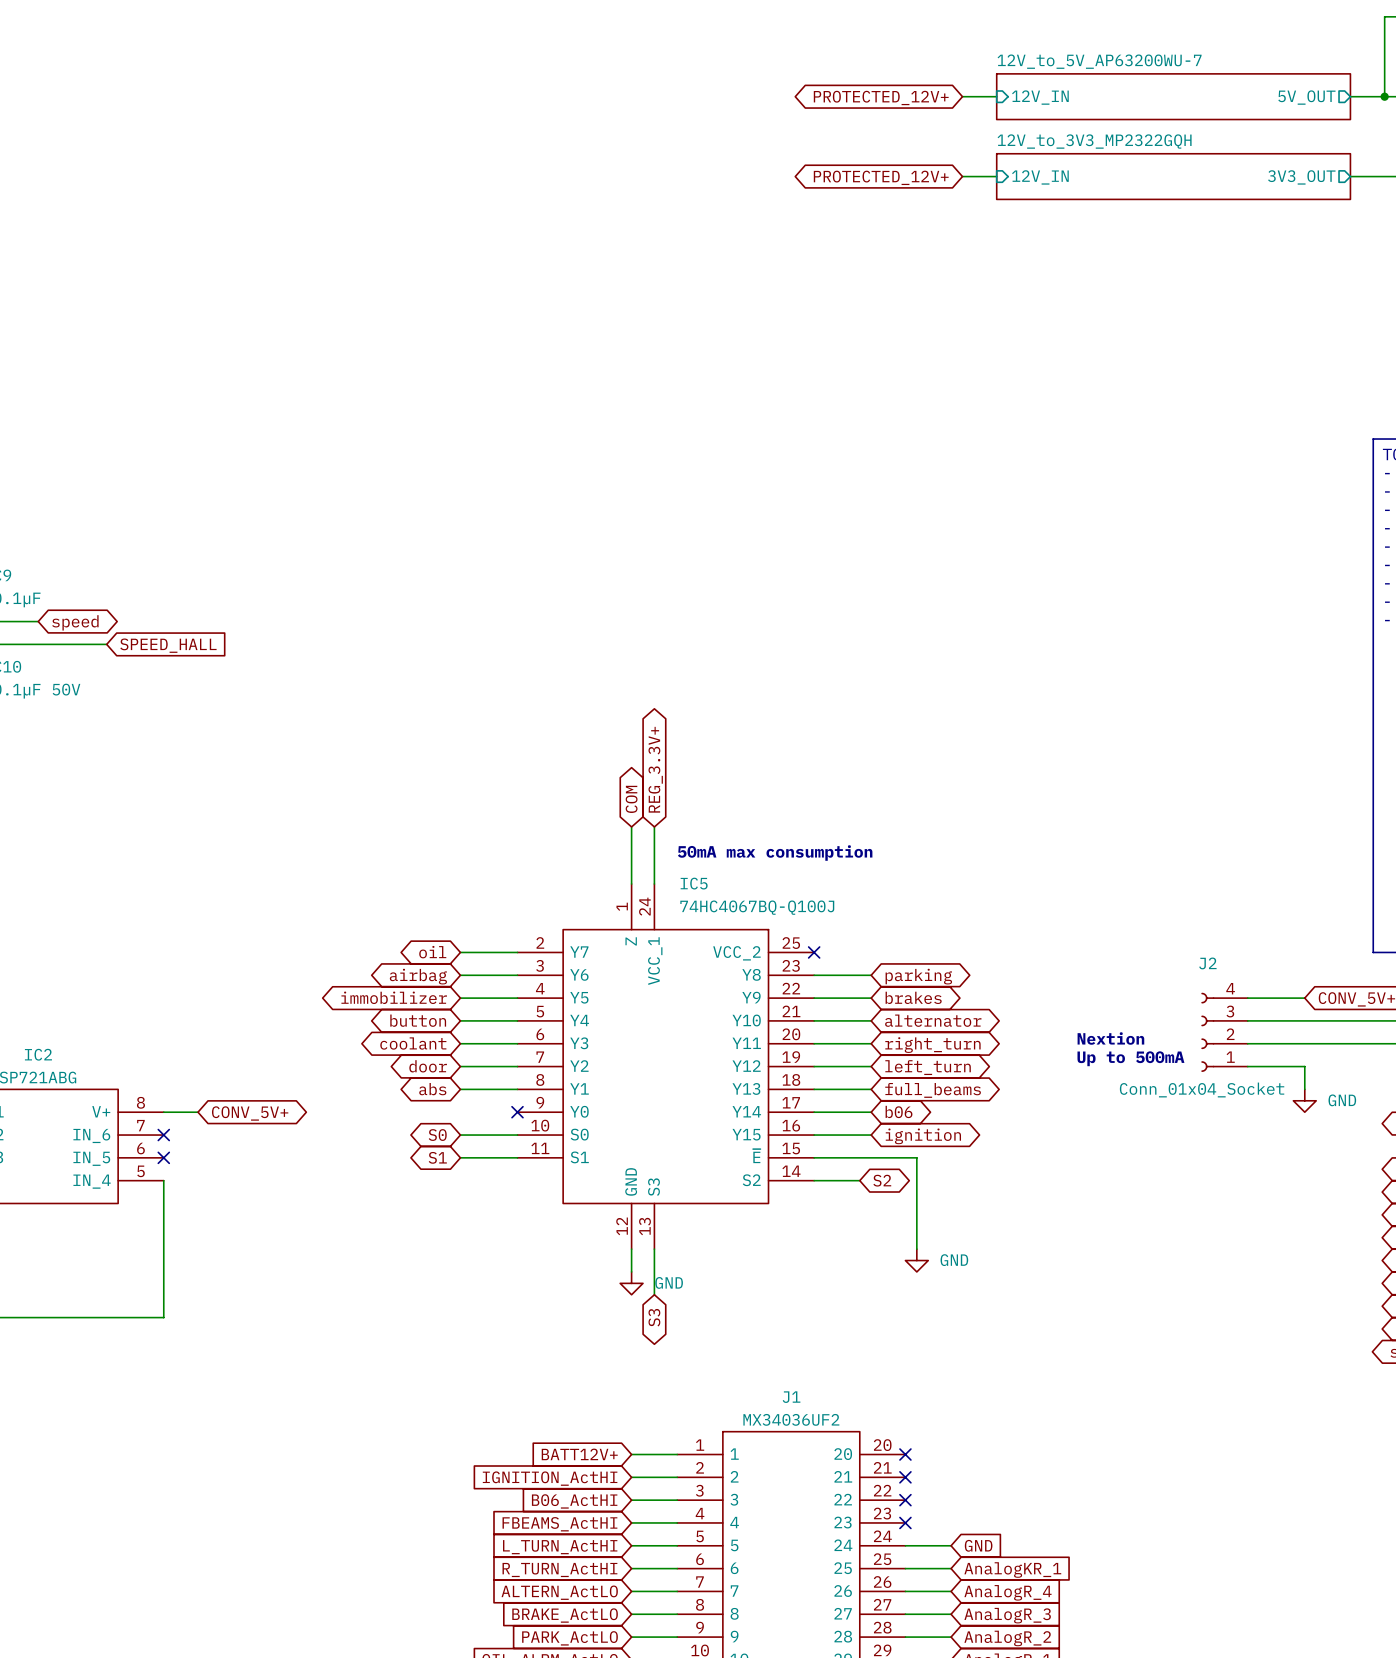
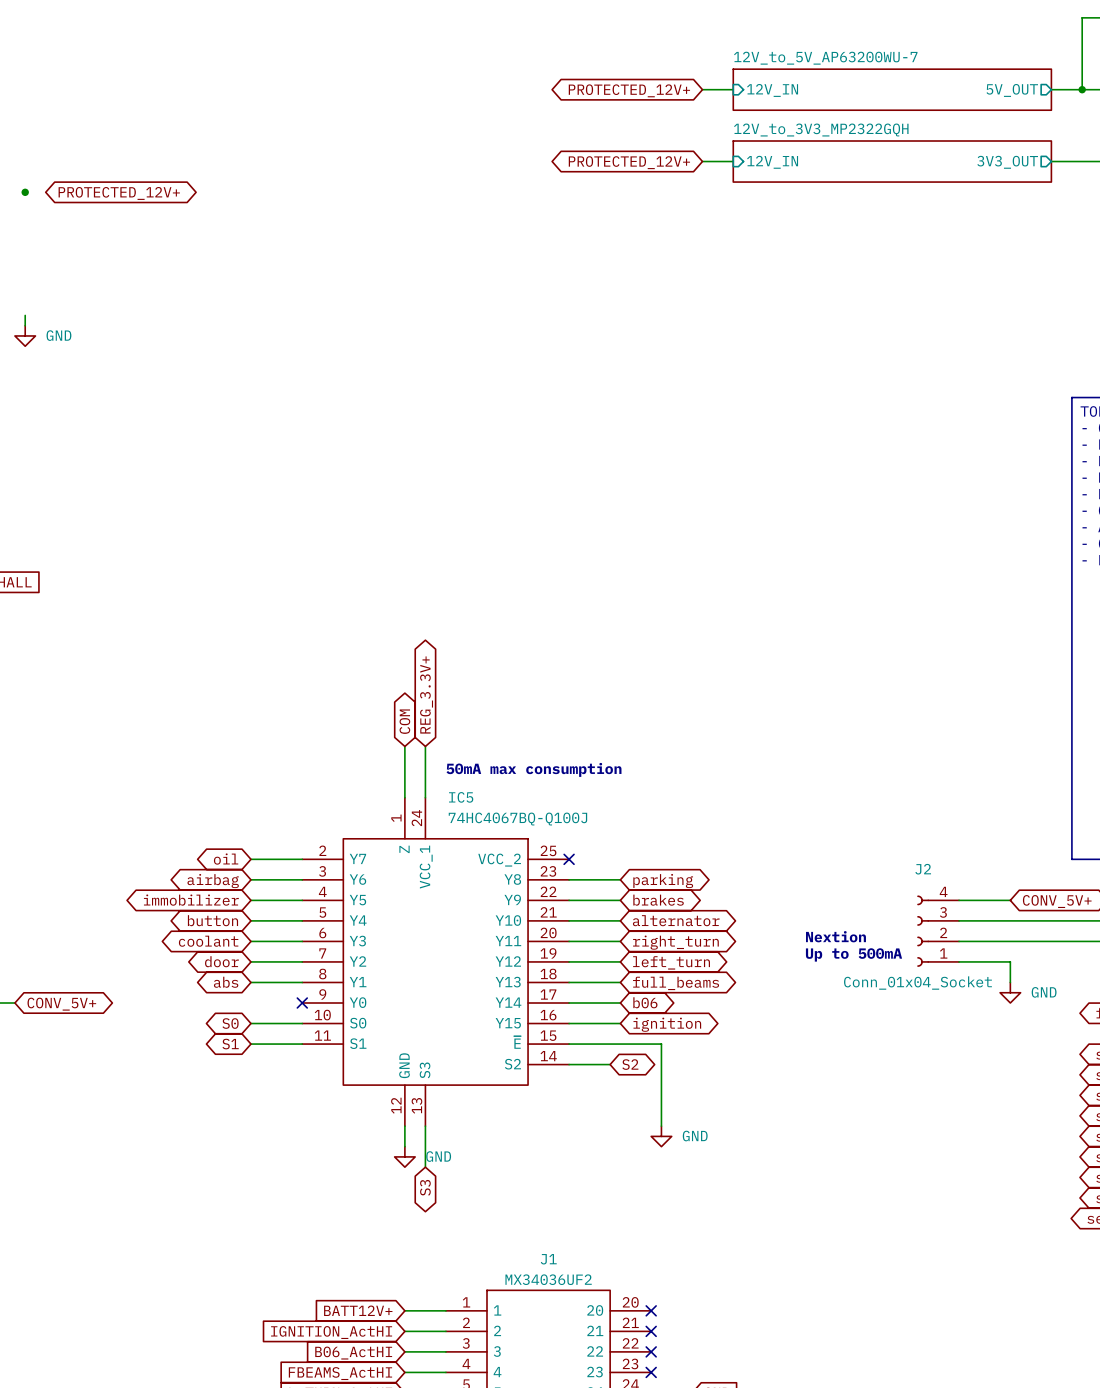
junction: none -> (25, 192)
global label: none -> PROTECTED_12V+ (119, 193)
wire: none -> (25, 315) (25, 325)
power symbol: none -> GND (25, 335)

